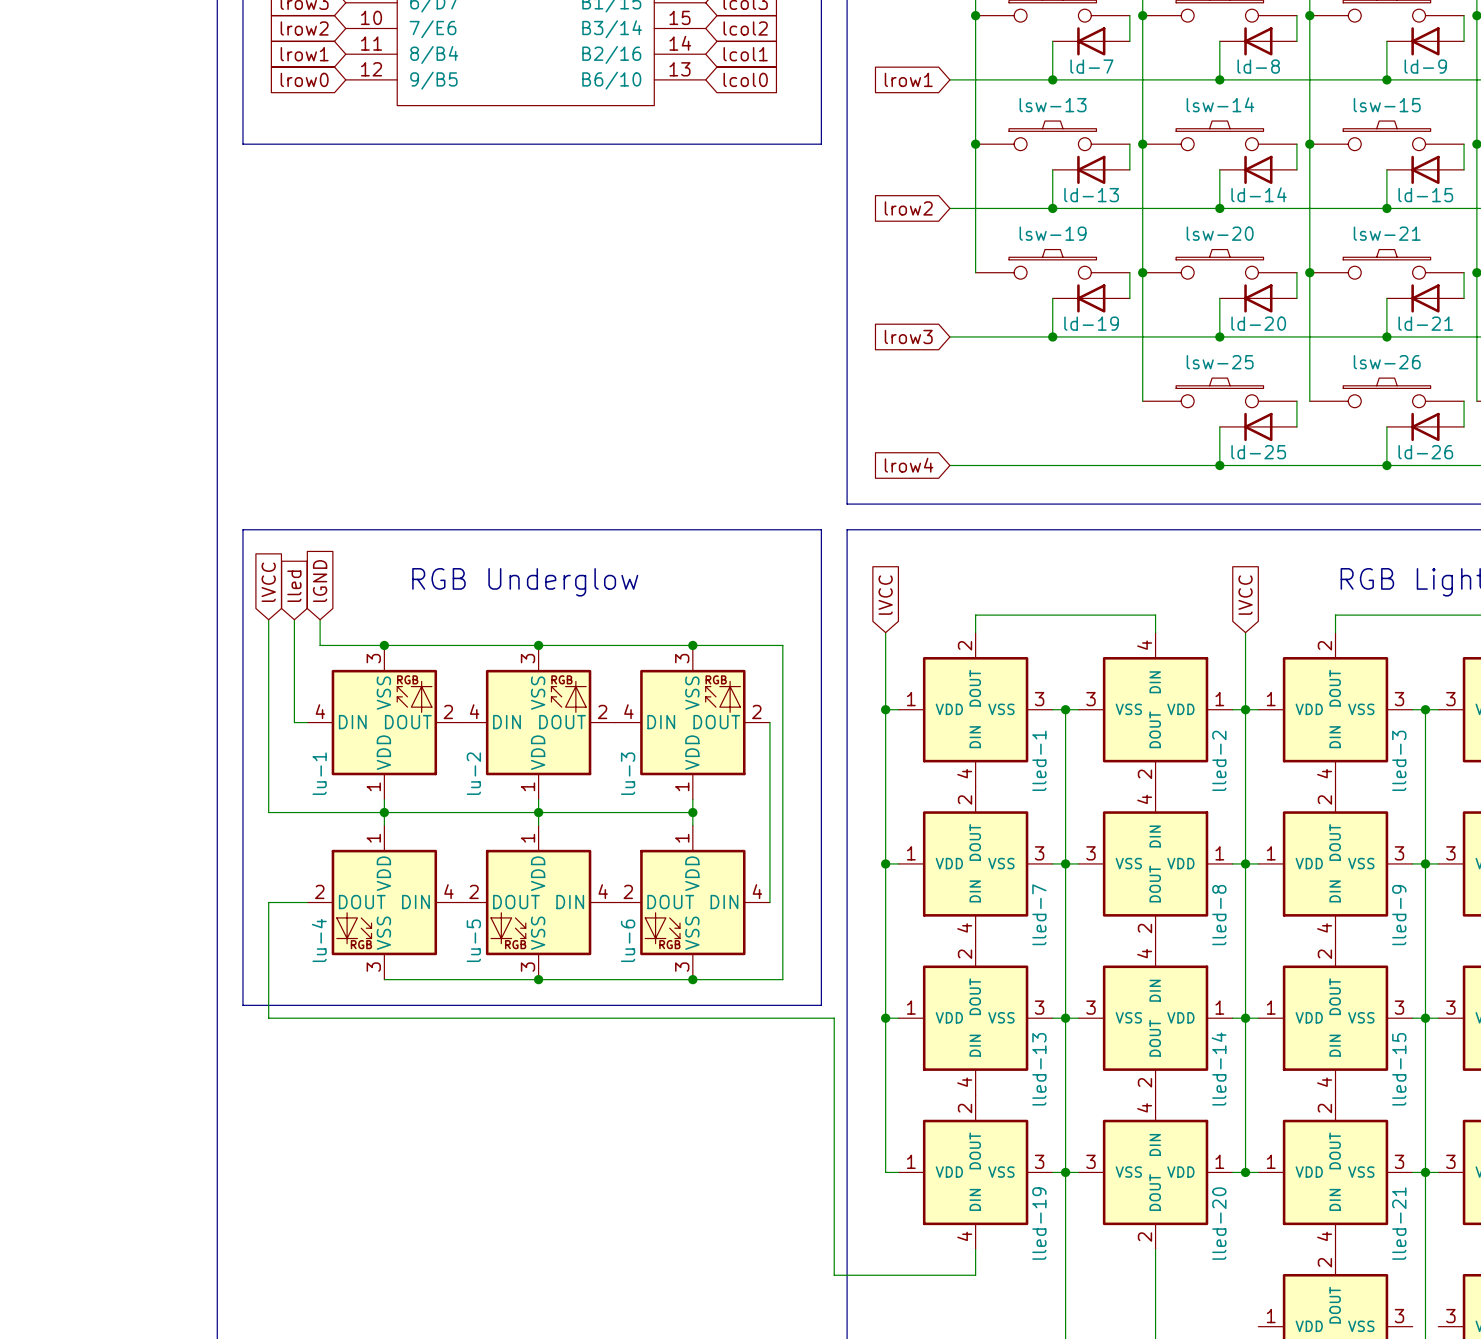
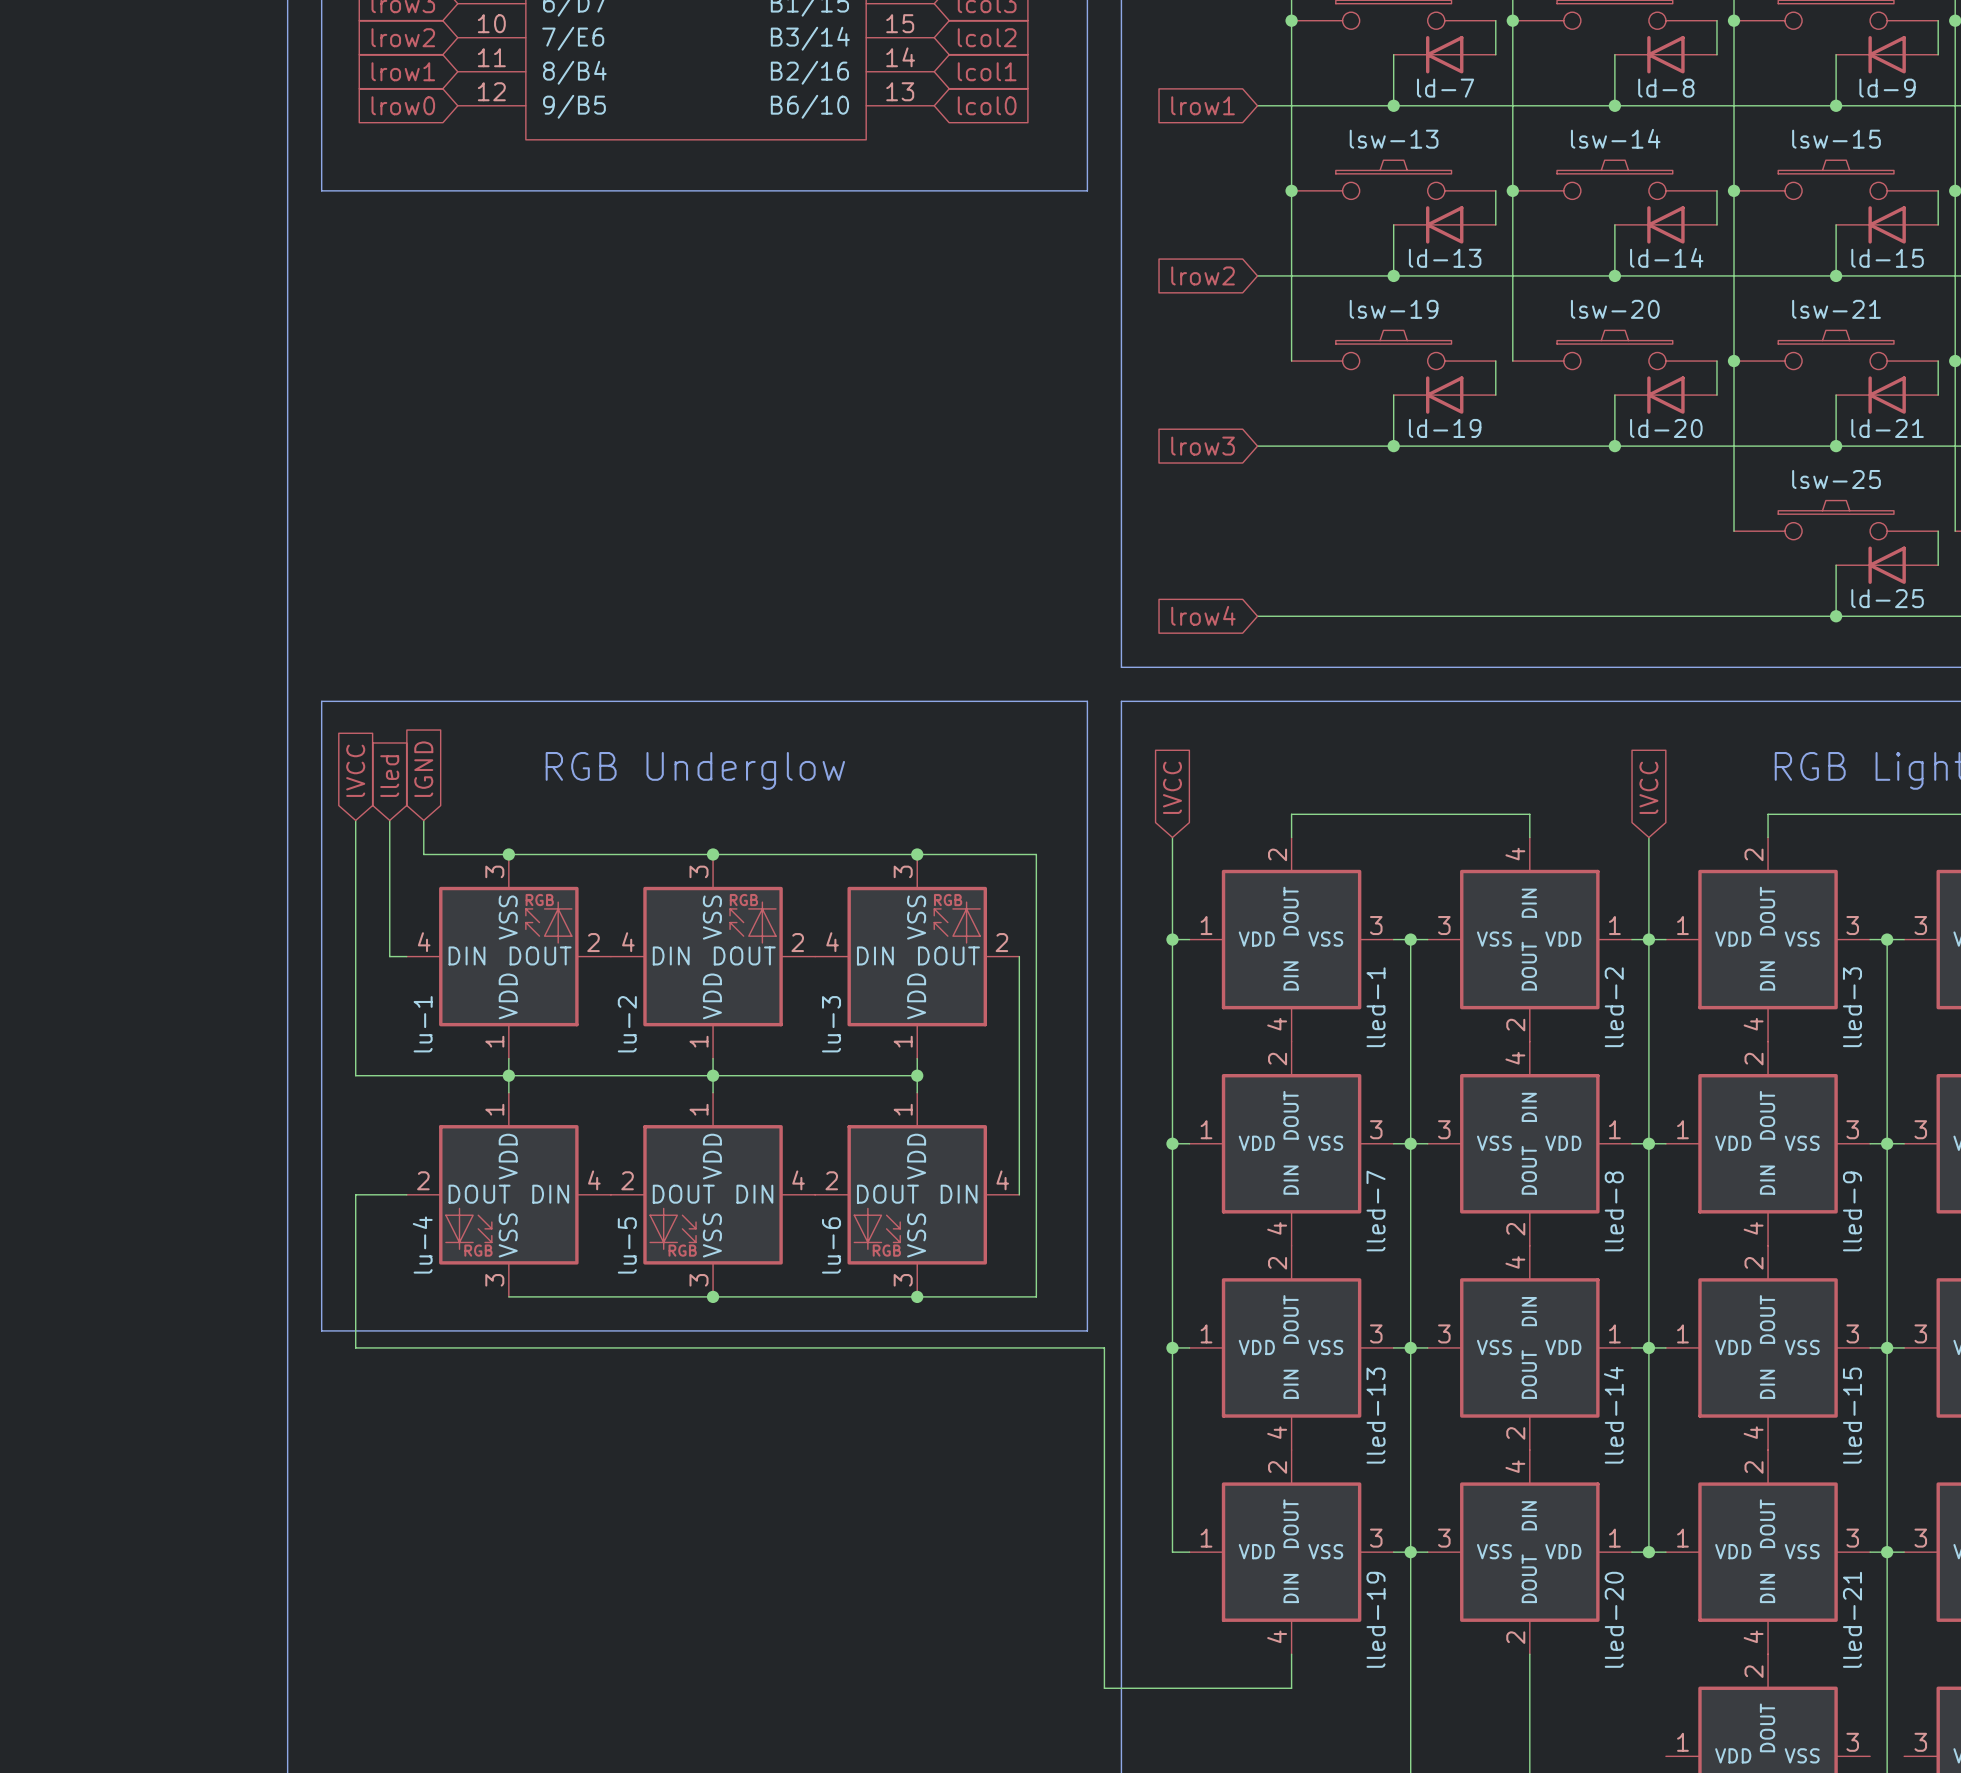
wire: (1142, 272) (1142, 401) -> none
junction: (1142, 272) -> none
lsw-26 name: lsw-26 (1387, 362) -> lsw-25 (1836, 479)
lsw-25: (1219, 392) -> none
wire: (1296, 401) (1296, 426) -> none
wire: (1219, 426) (1219, 465) -> none
ld-25: (1258, 426) -> none
ld-26 name: ld-26 (1425, 452) -> ld-25 (1887, 598)
junction: (1219, 465) -> none

